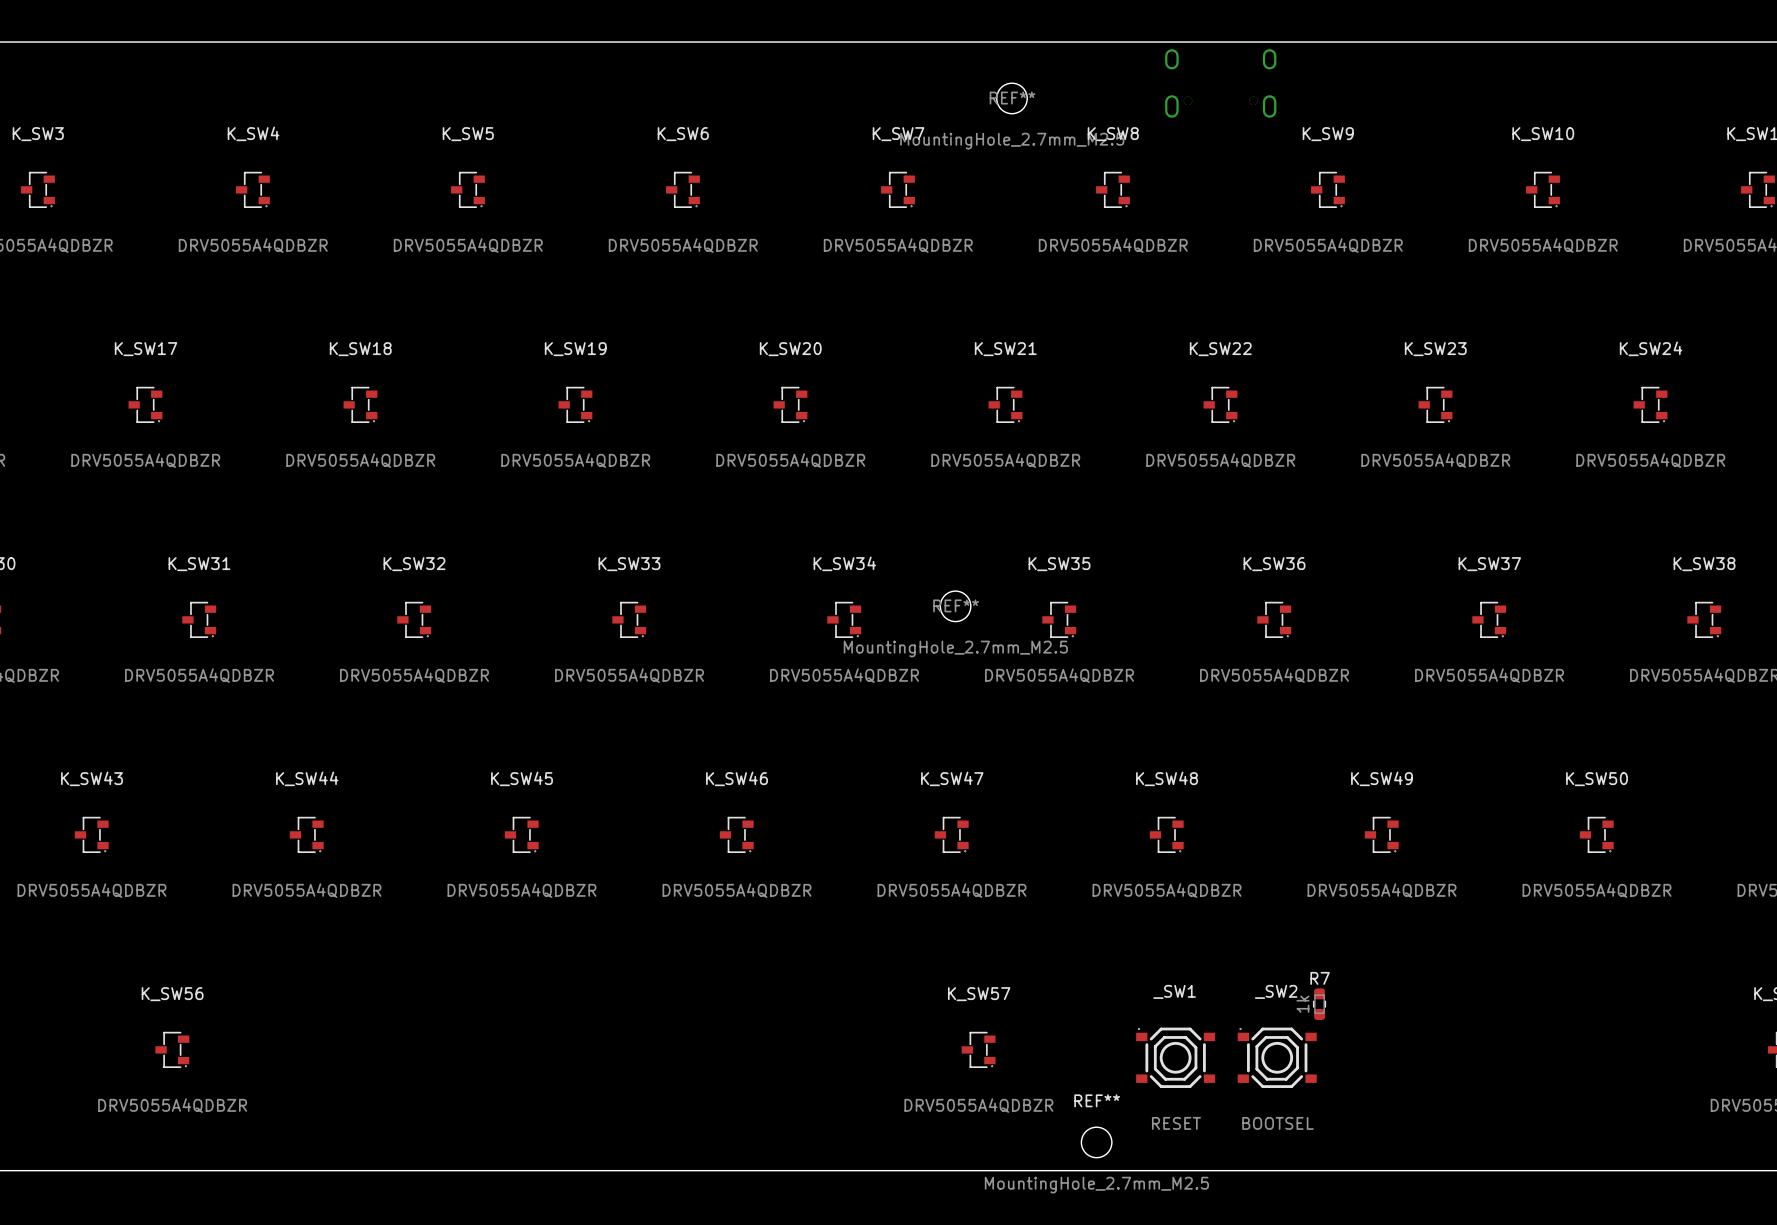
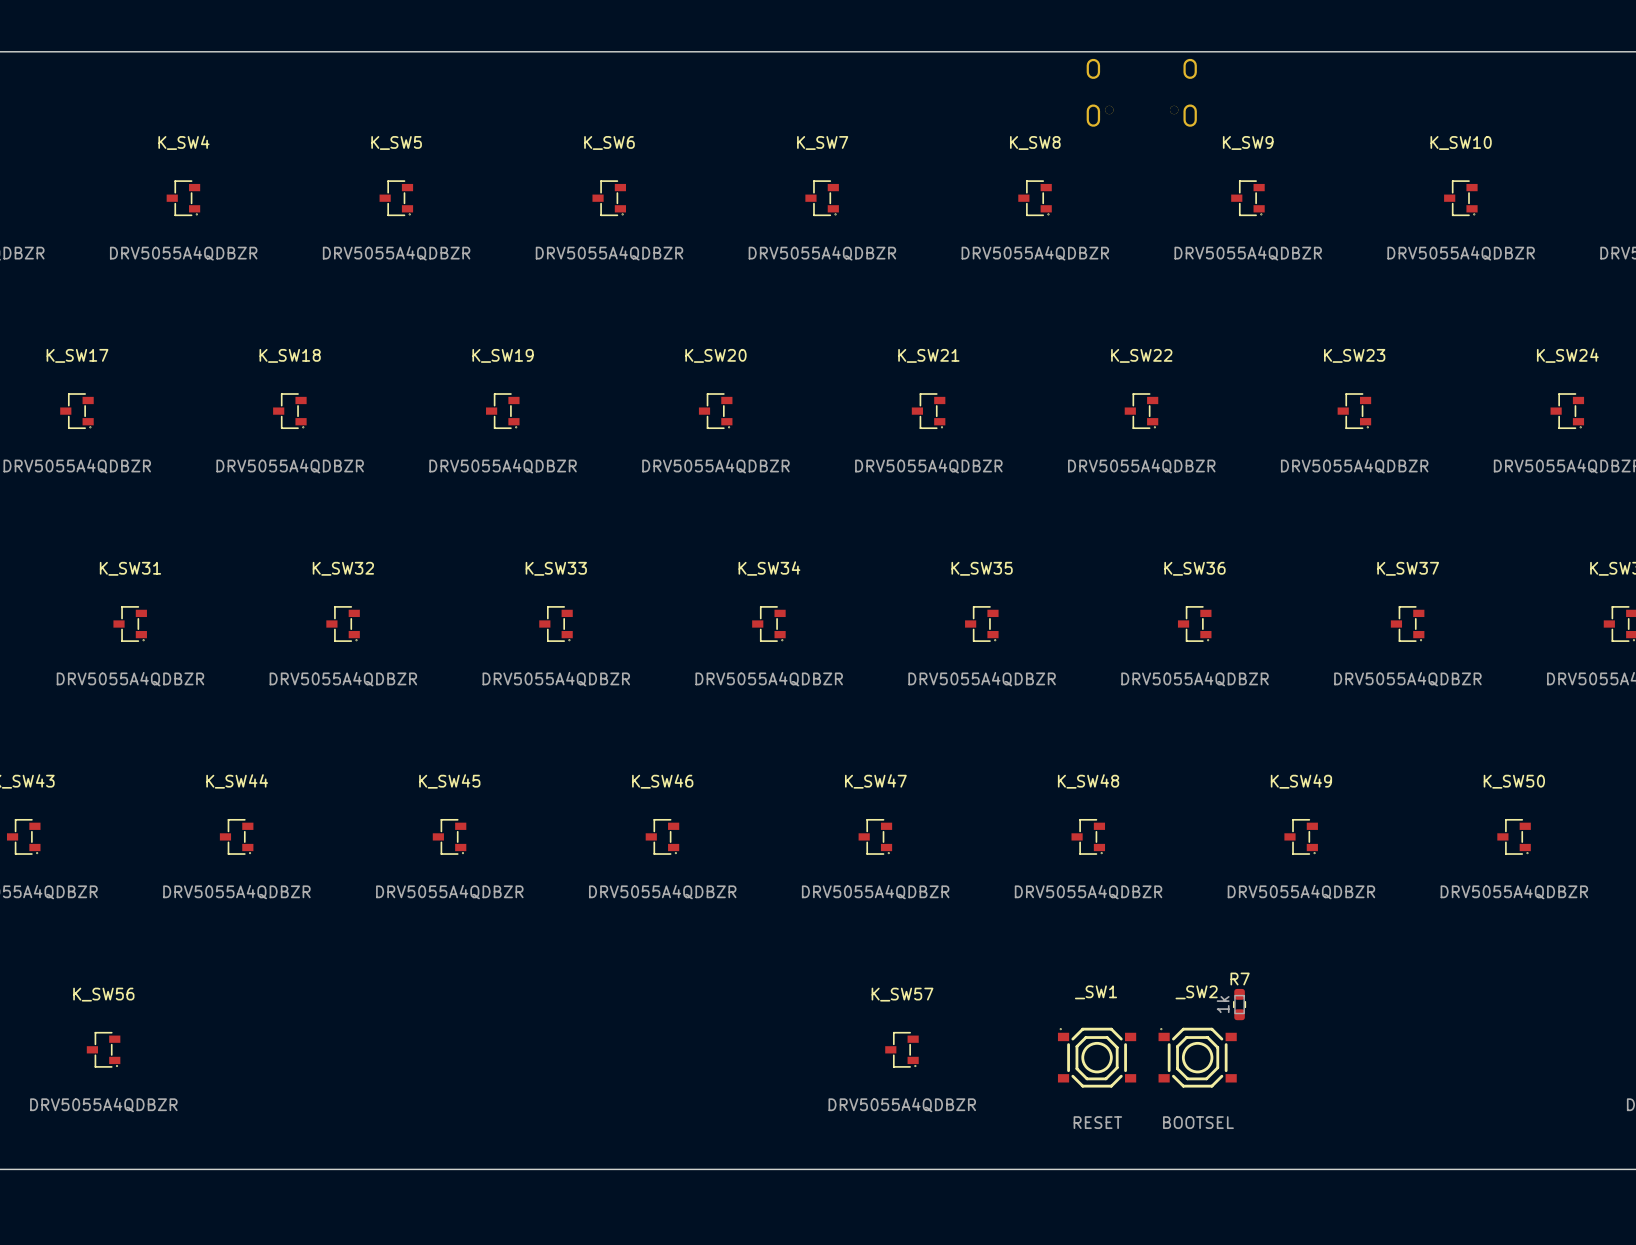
REF**: MountingHole_2.7mm_M2.5 (1011, 98) -> none
REF**: MountingHole_2.7mm_M2.5 (955, 606) -> none
REF**: MountingHole_2.7mm_M2.5 (1096, 1142) -> none

